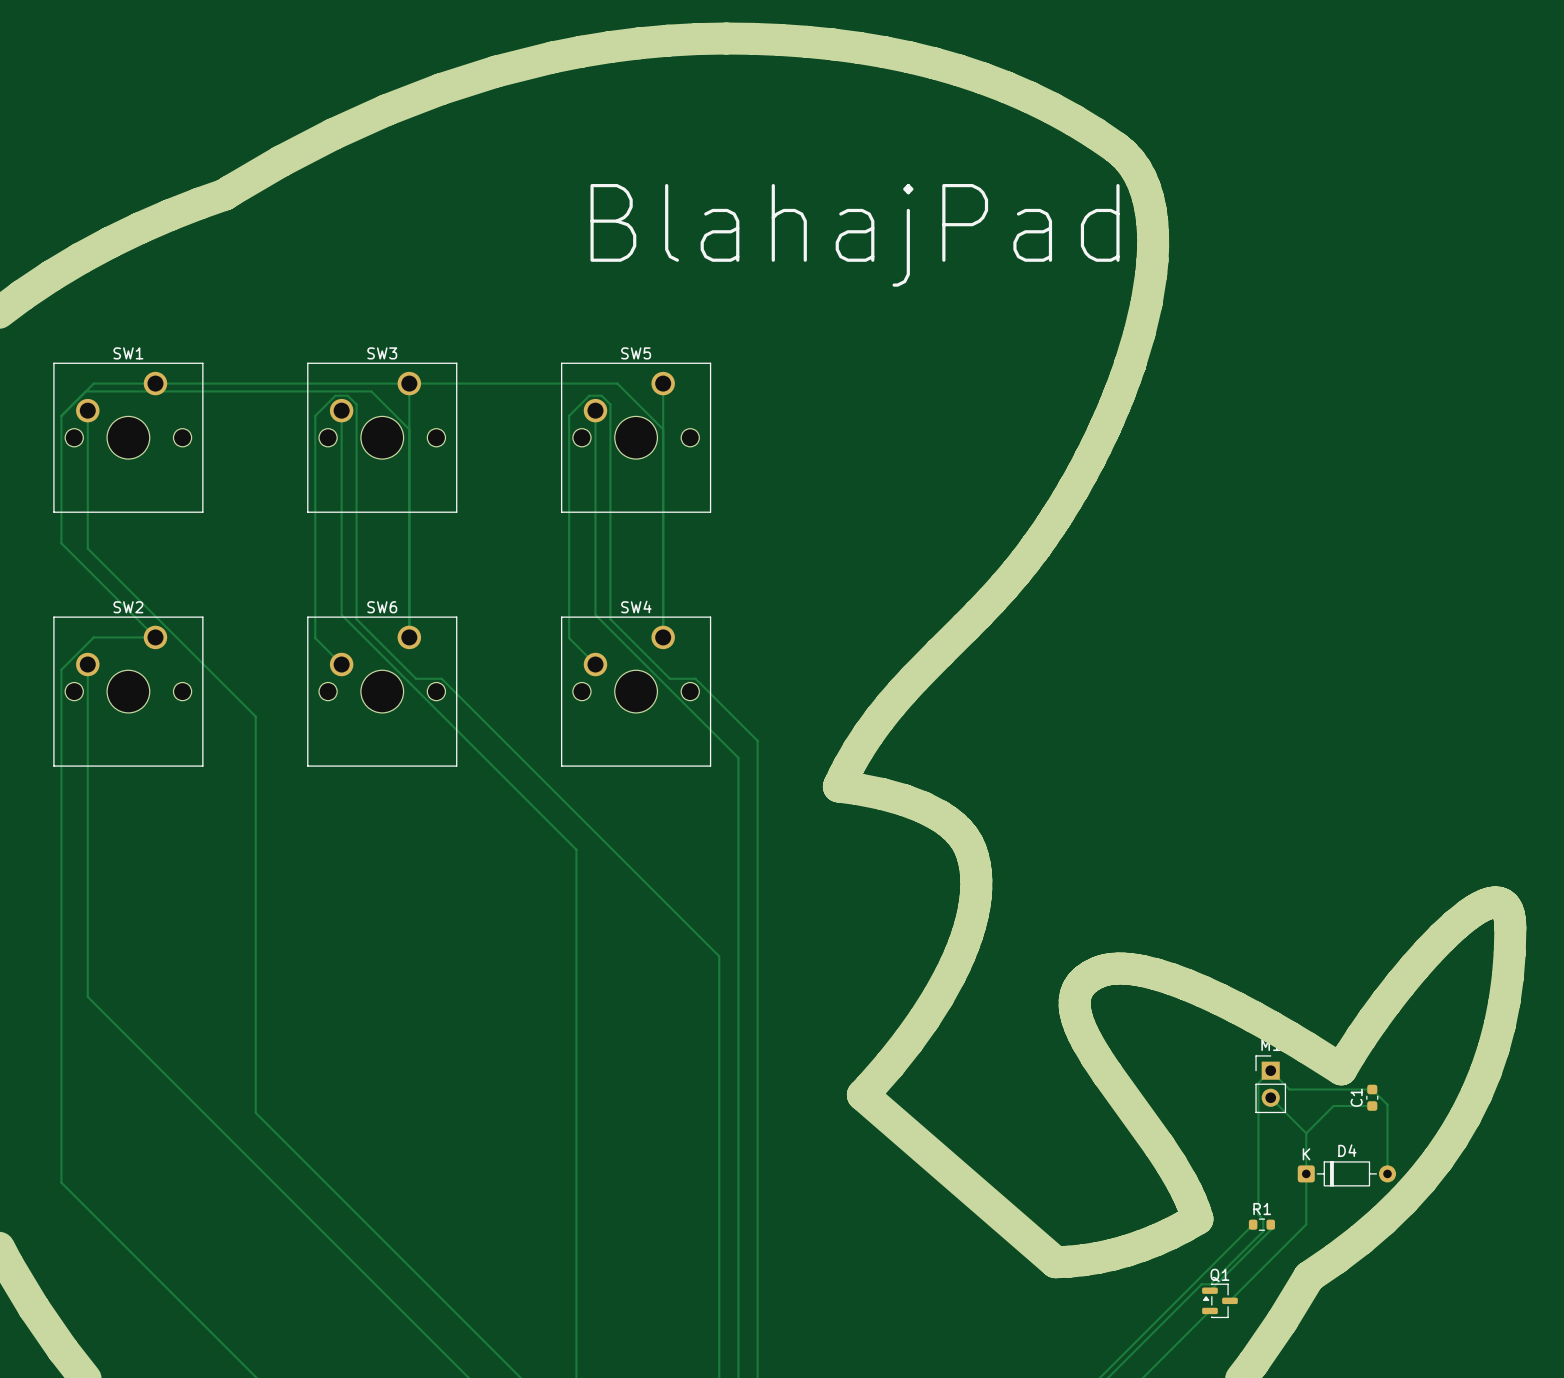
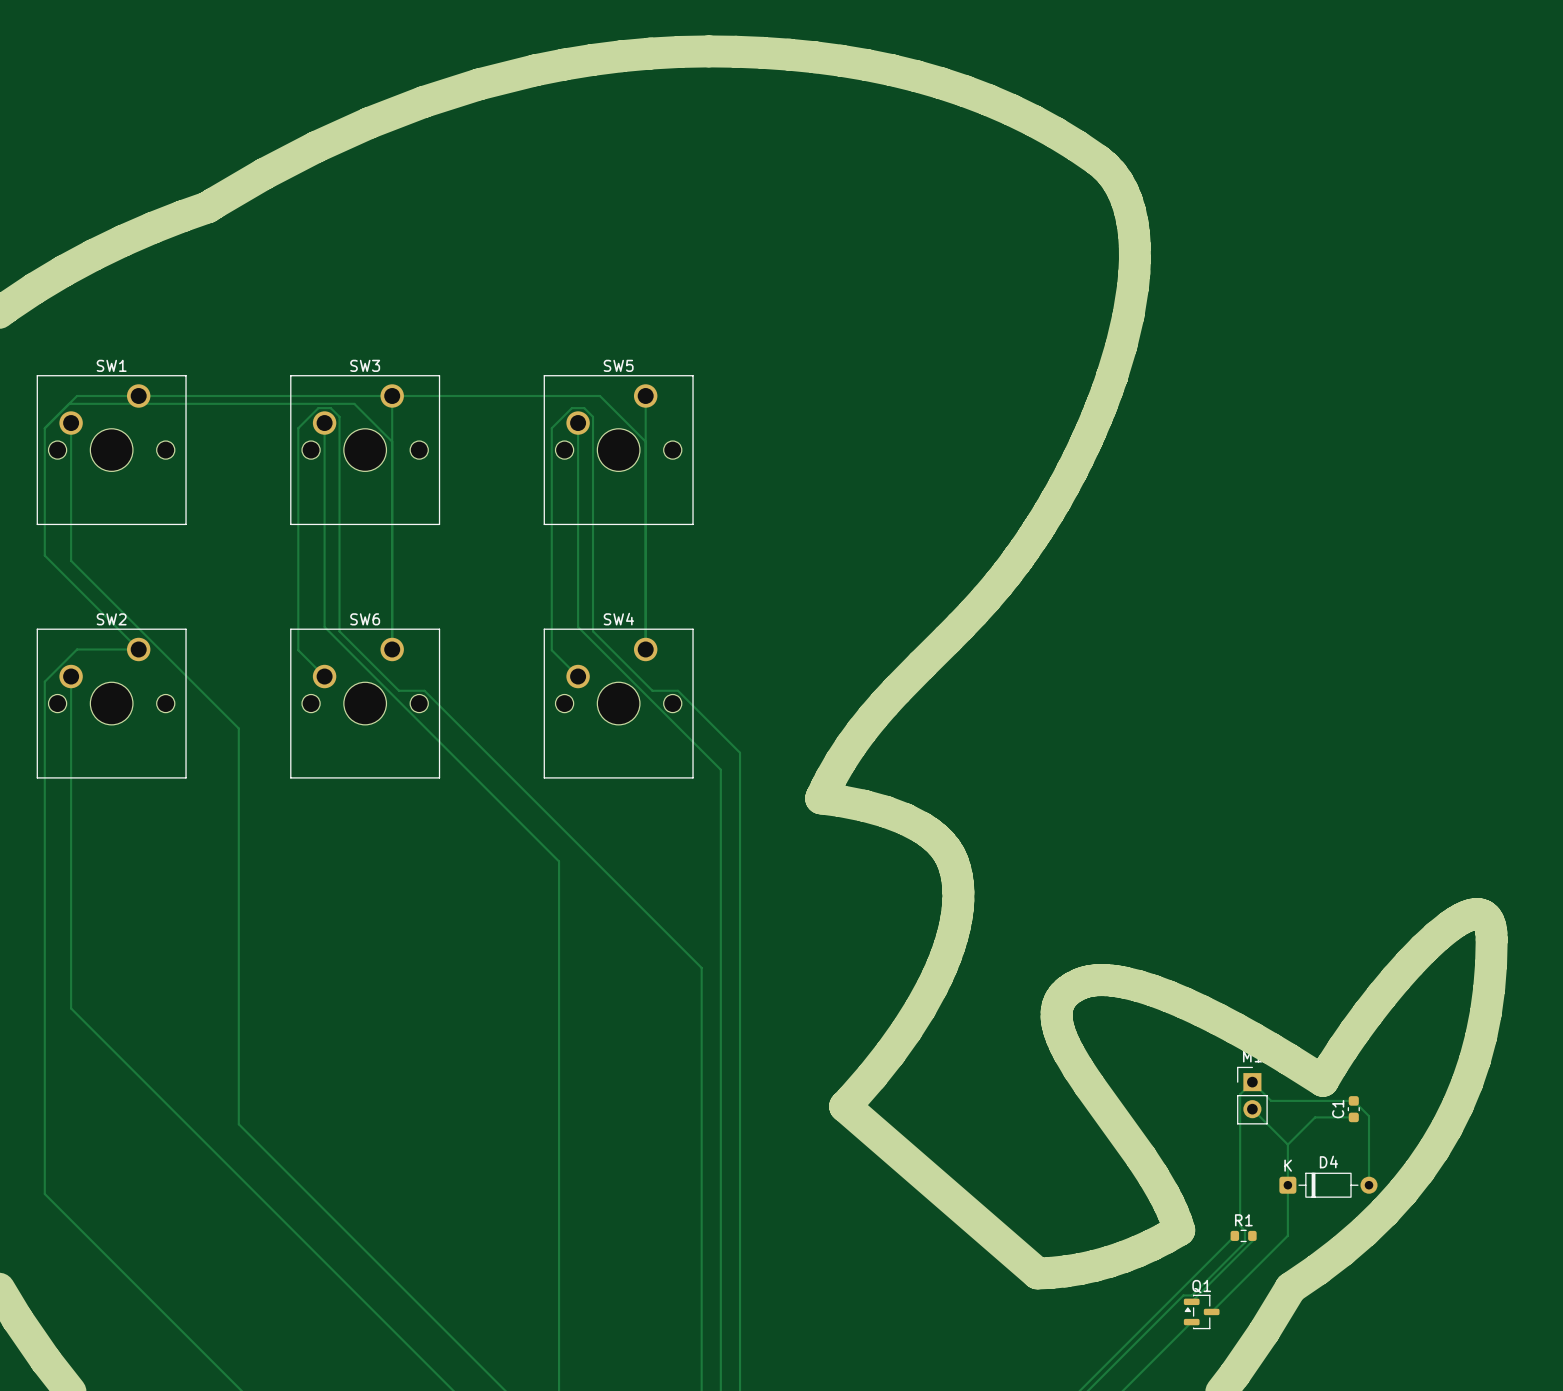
text: BlahajPad (855, 235) -> none

